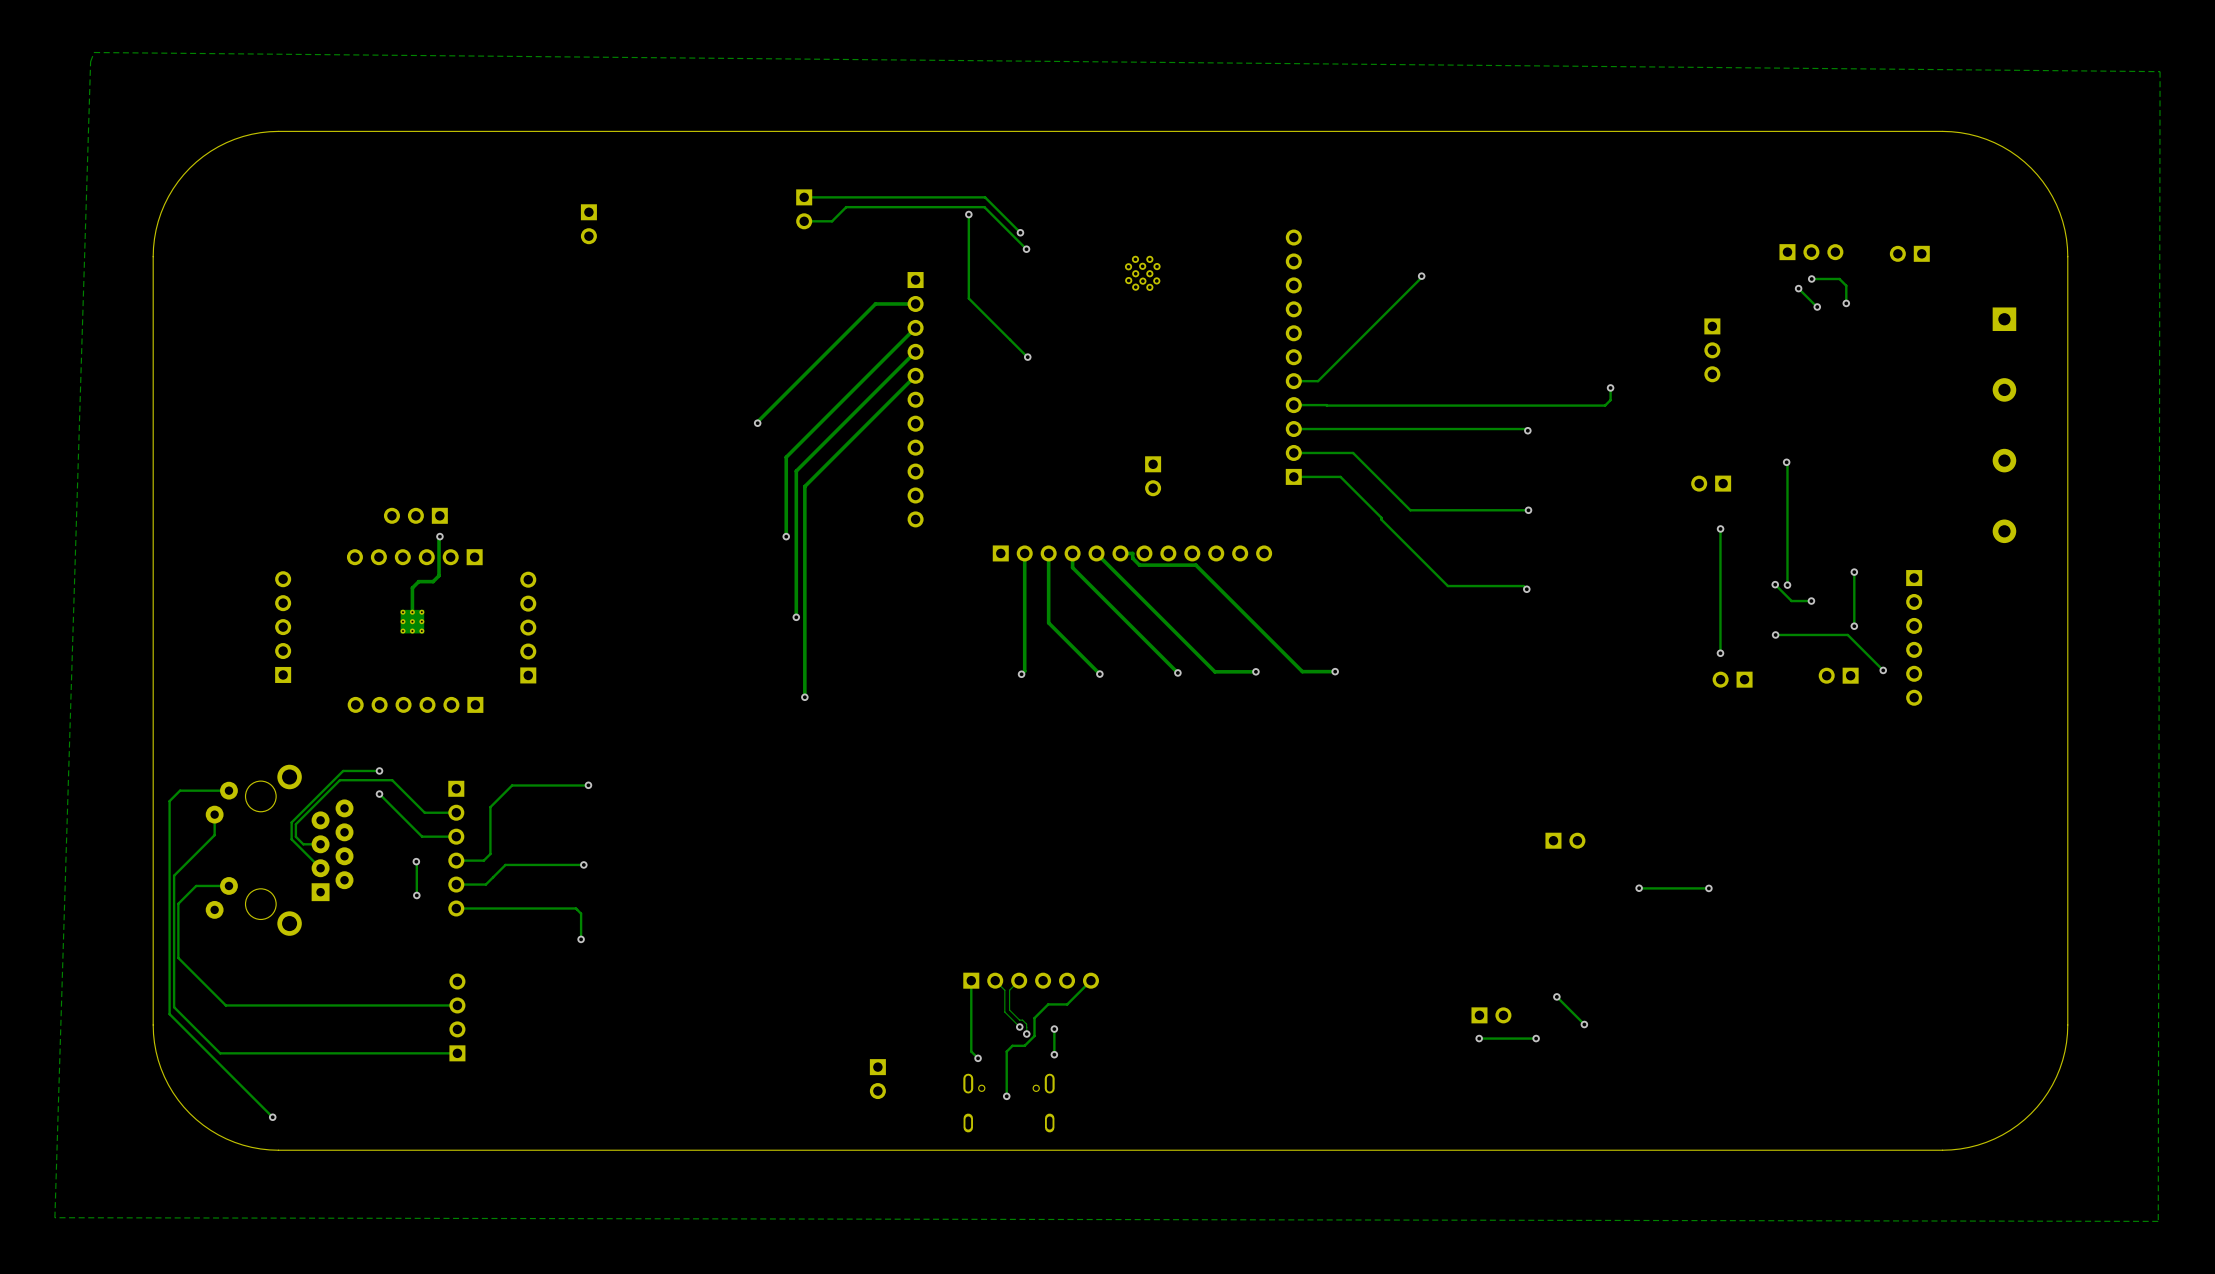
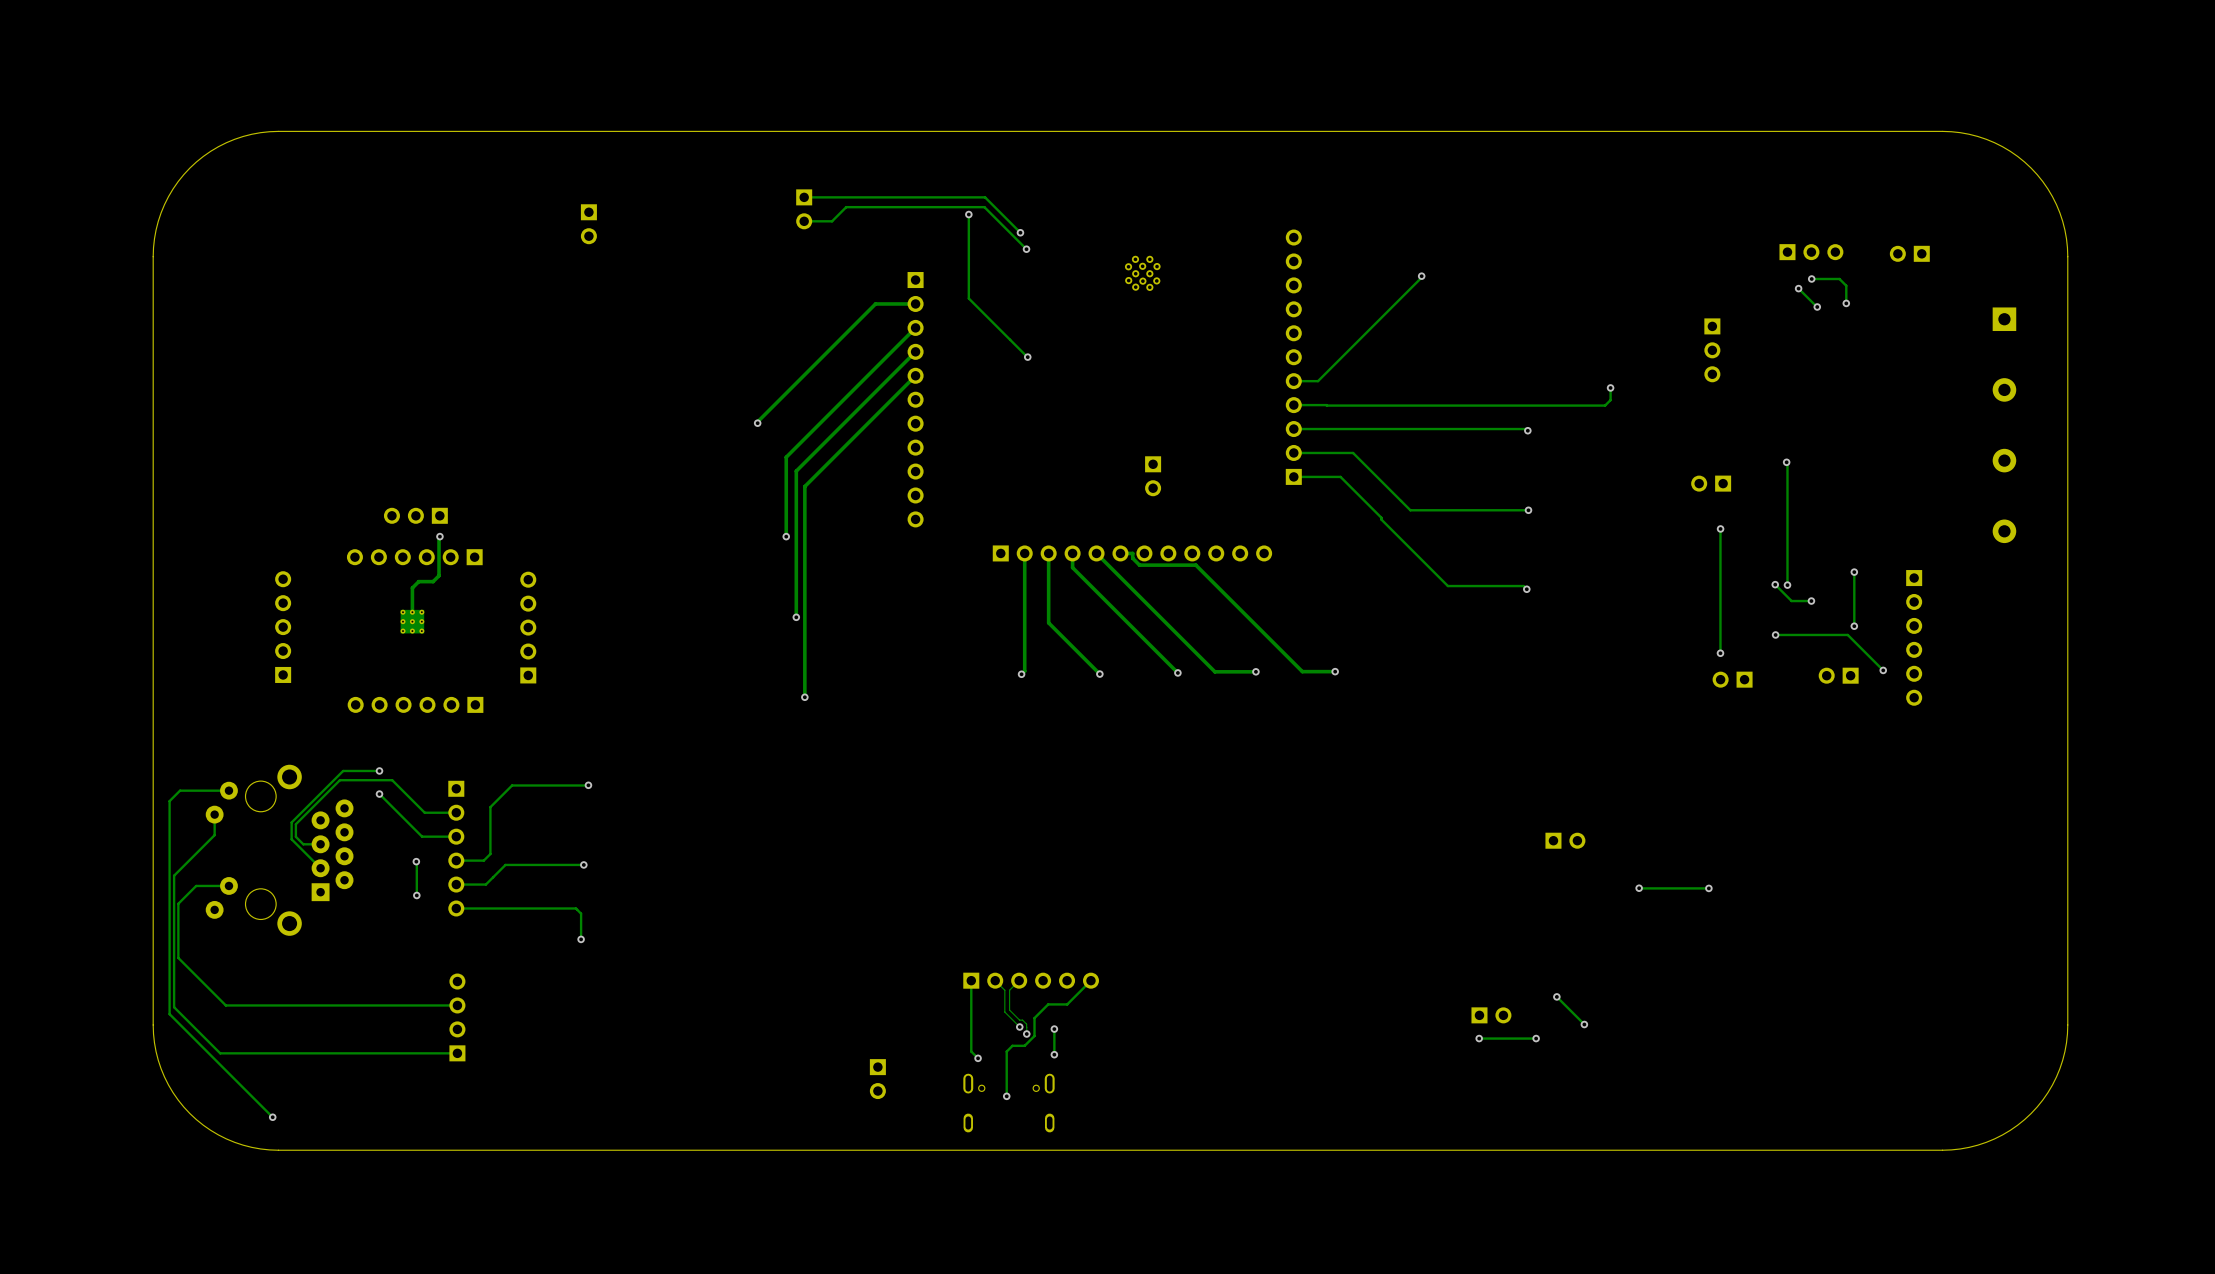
zone outline: (94, 52) (2160, 71) (2158, 1221) (54, 1217) (90, 61) (94, 52) -> none

